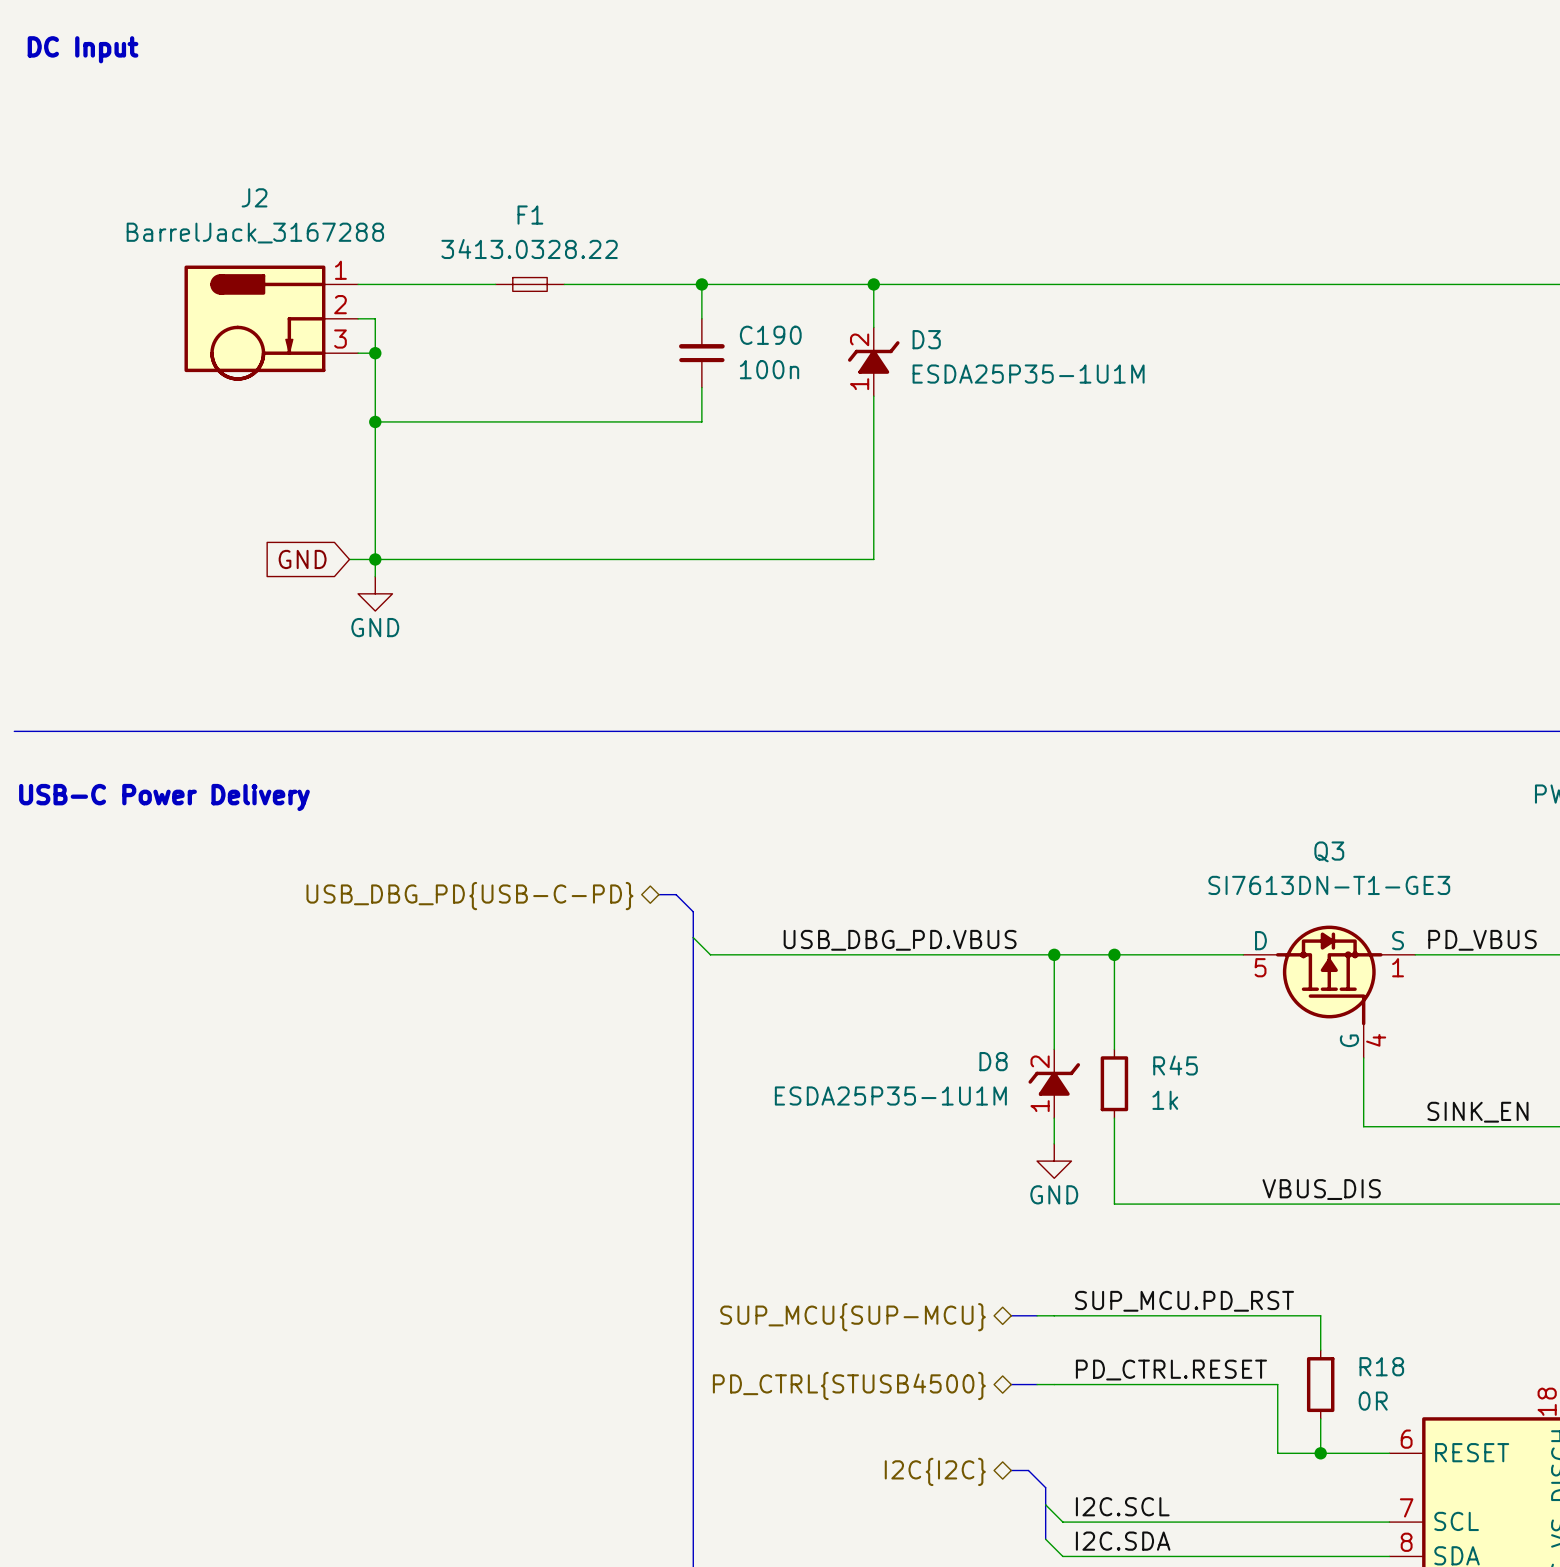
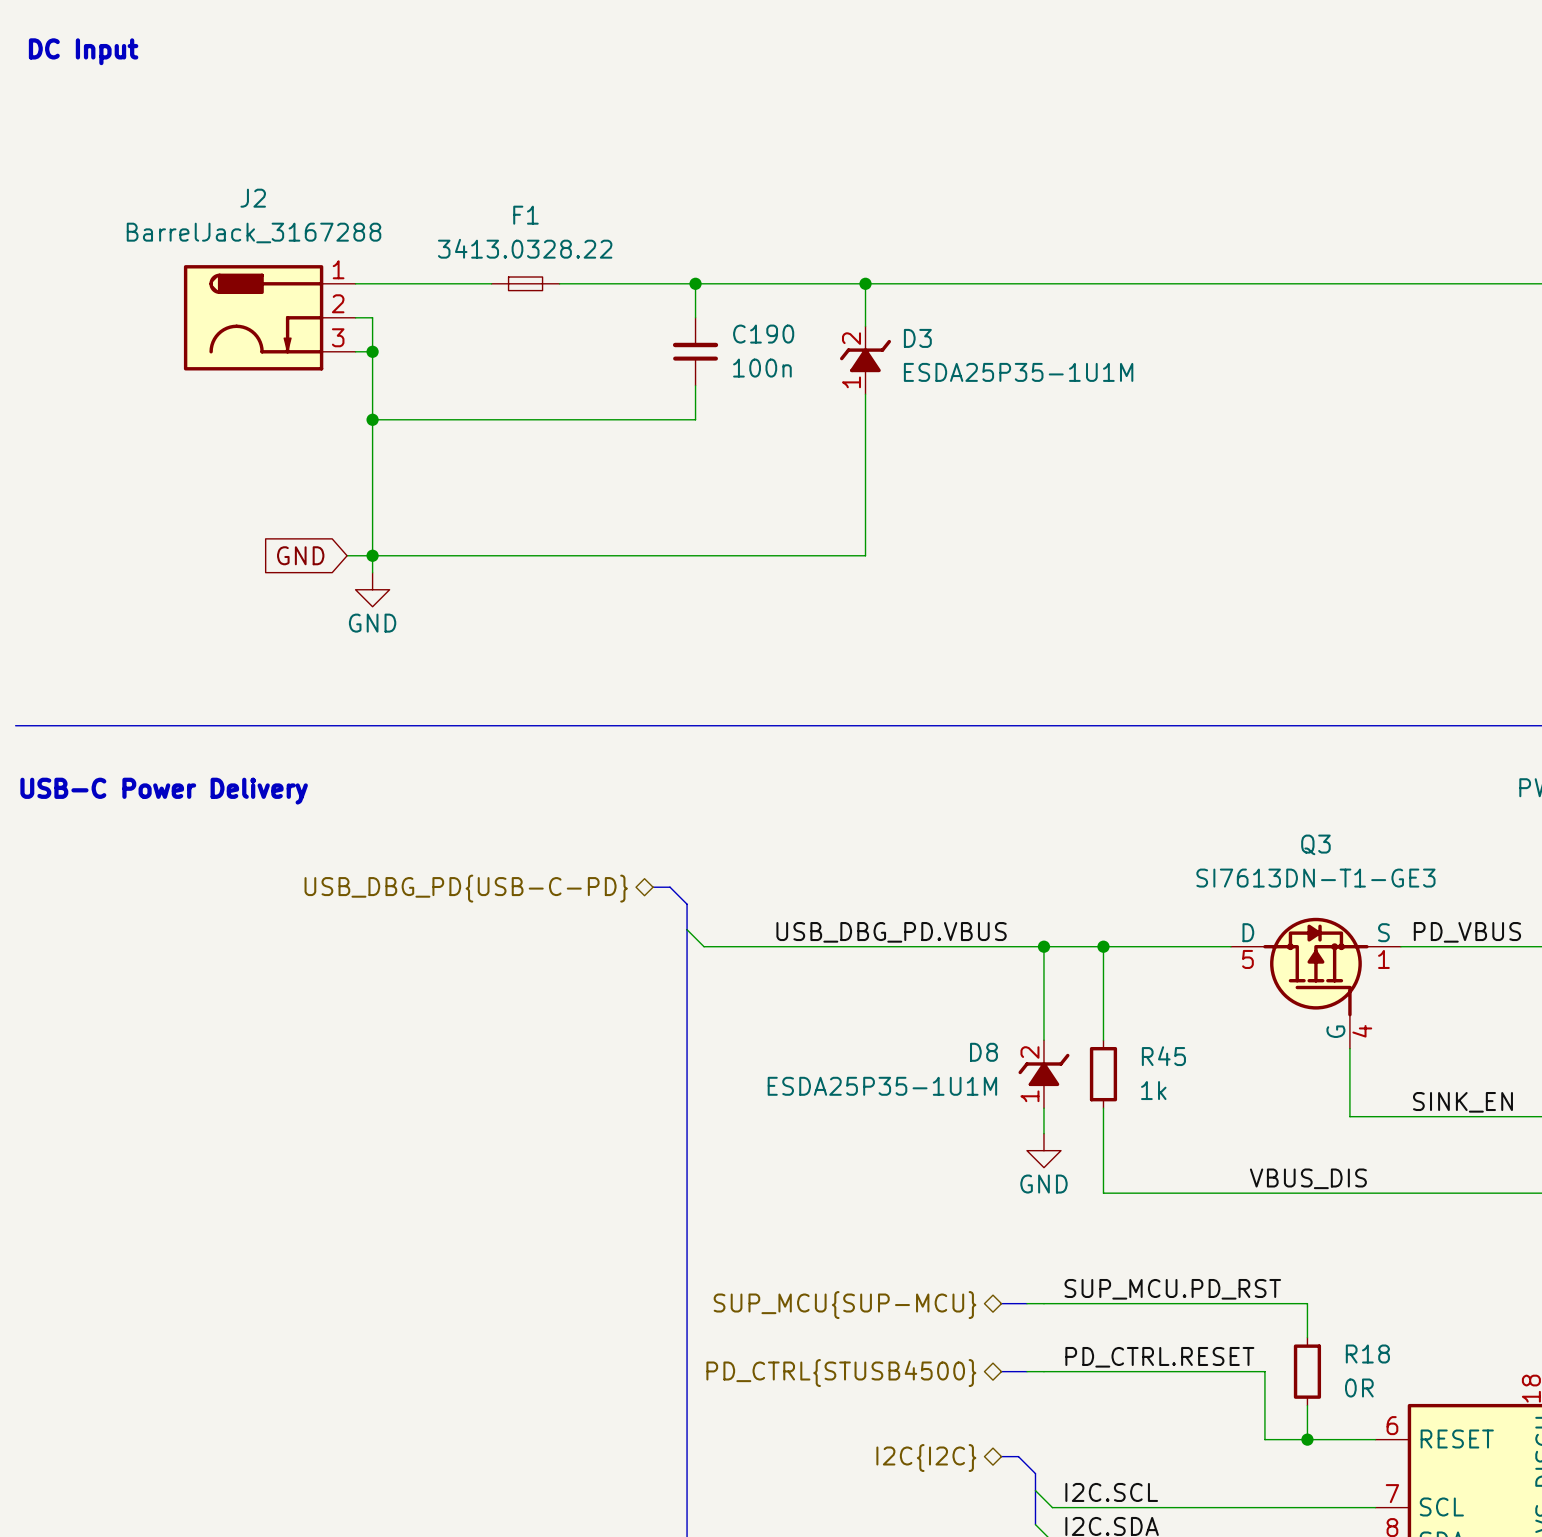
J2 symbol: [184, 265, 359, 381] -> [183, 265, 356, 371]

